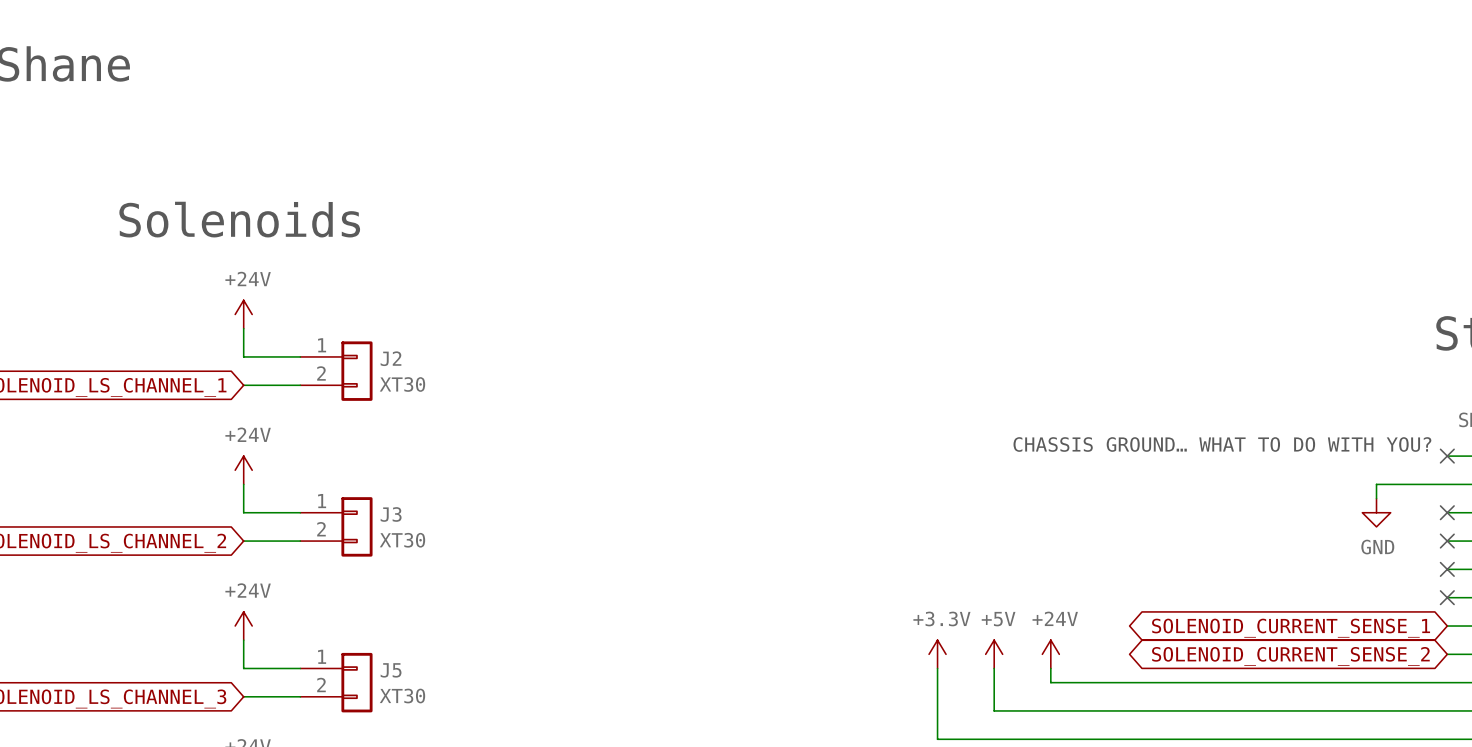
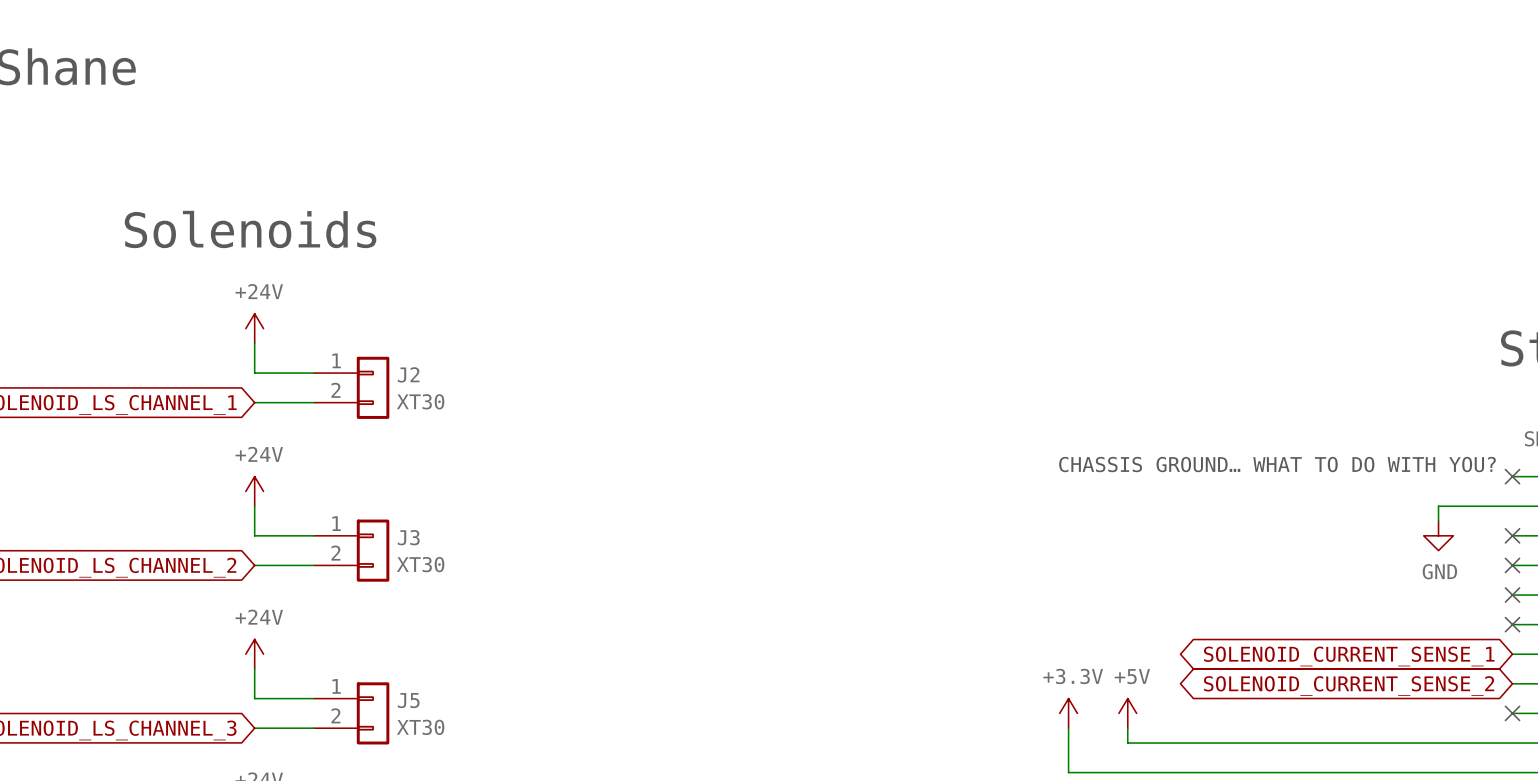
power symbol position: +3.3V (937, 654) -> +3.3V (1068, 713)
power symbol position: +5V (994, 654) -> +5V (1127, 713)
power symbol: +24V (1050, 654) -> none
wire: (937, 668) (937, 739) (1022, 739) -> (1068, 728) (1068, 772)
wire: (994, 668) (994, 710) (1079, 710) -> (1127, 728) (1127, 743)
wire: (1050, 668) (1050, 682) (1447, 682) -> none
no-connect mark: none -> (1512, 713)

